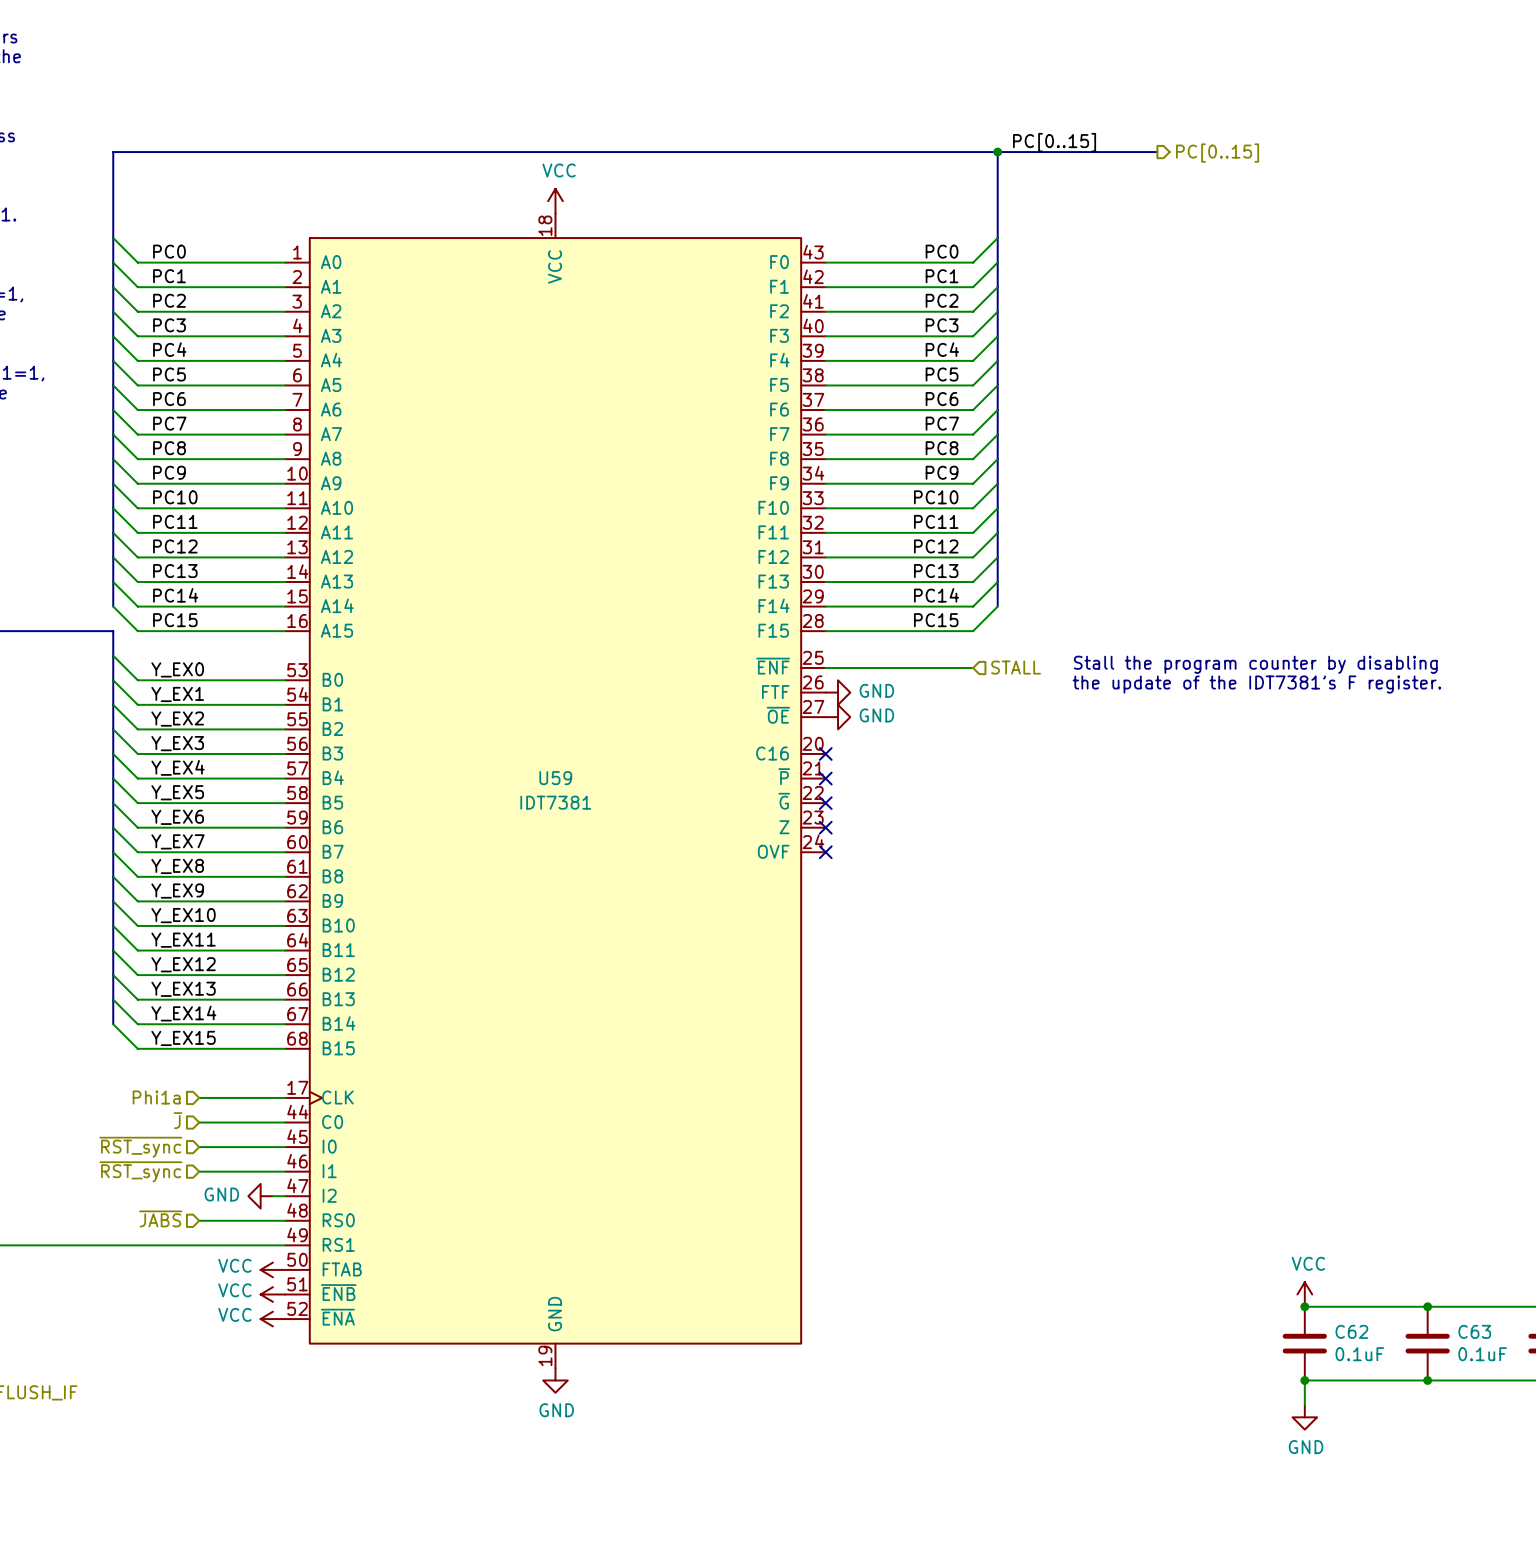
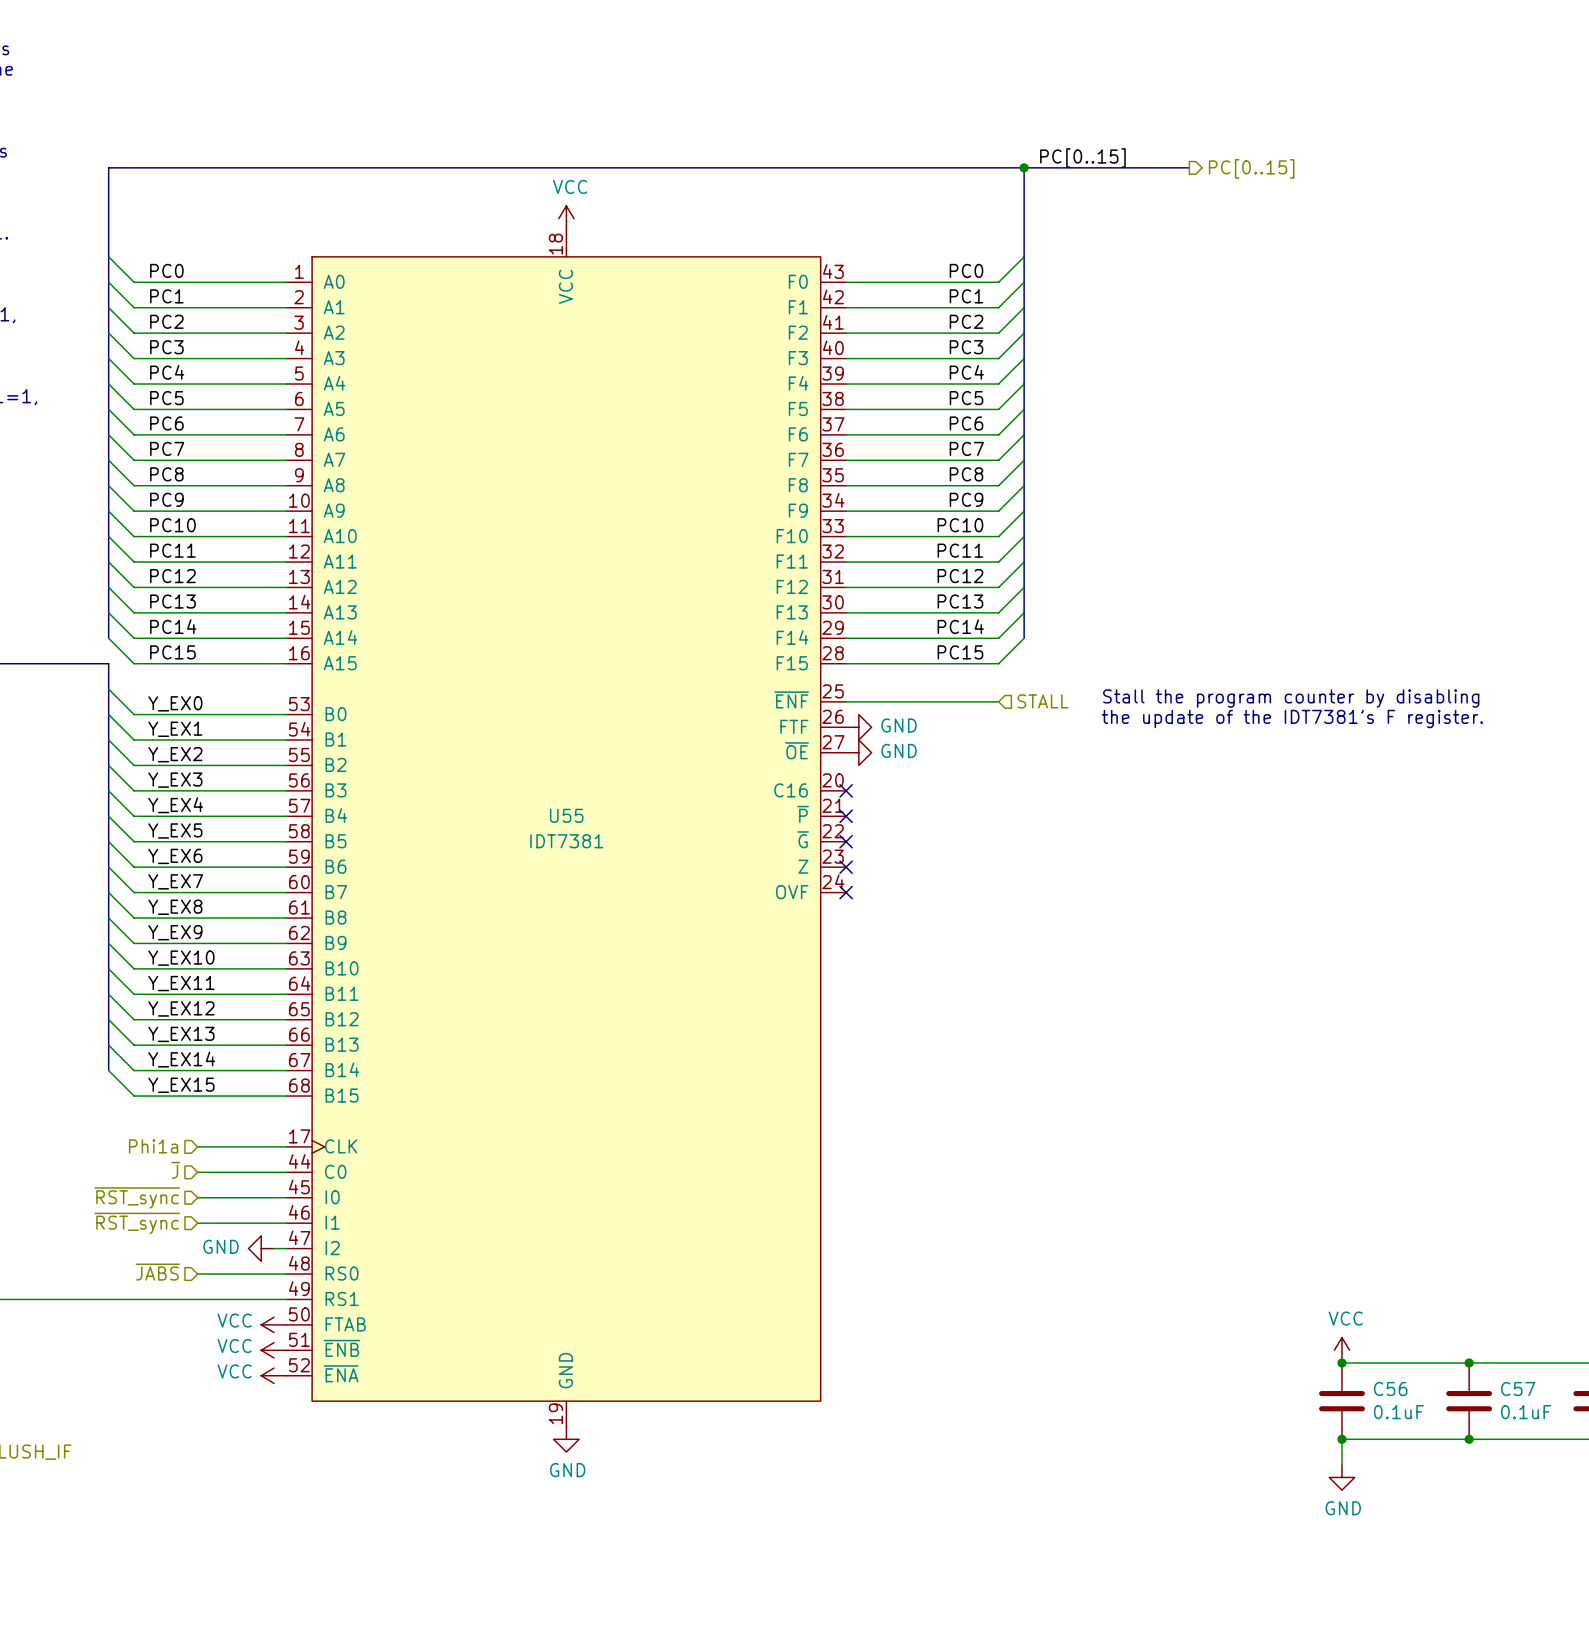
U59 name: U59 (555, 778) -> U55 (566, 815)
C62 name: C62 (1351, 1331) -> C56 (1390, 1389)
C63 name: C63 (1474, 1331) -> C57 (1518, 1389)

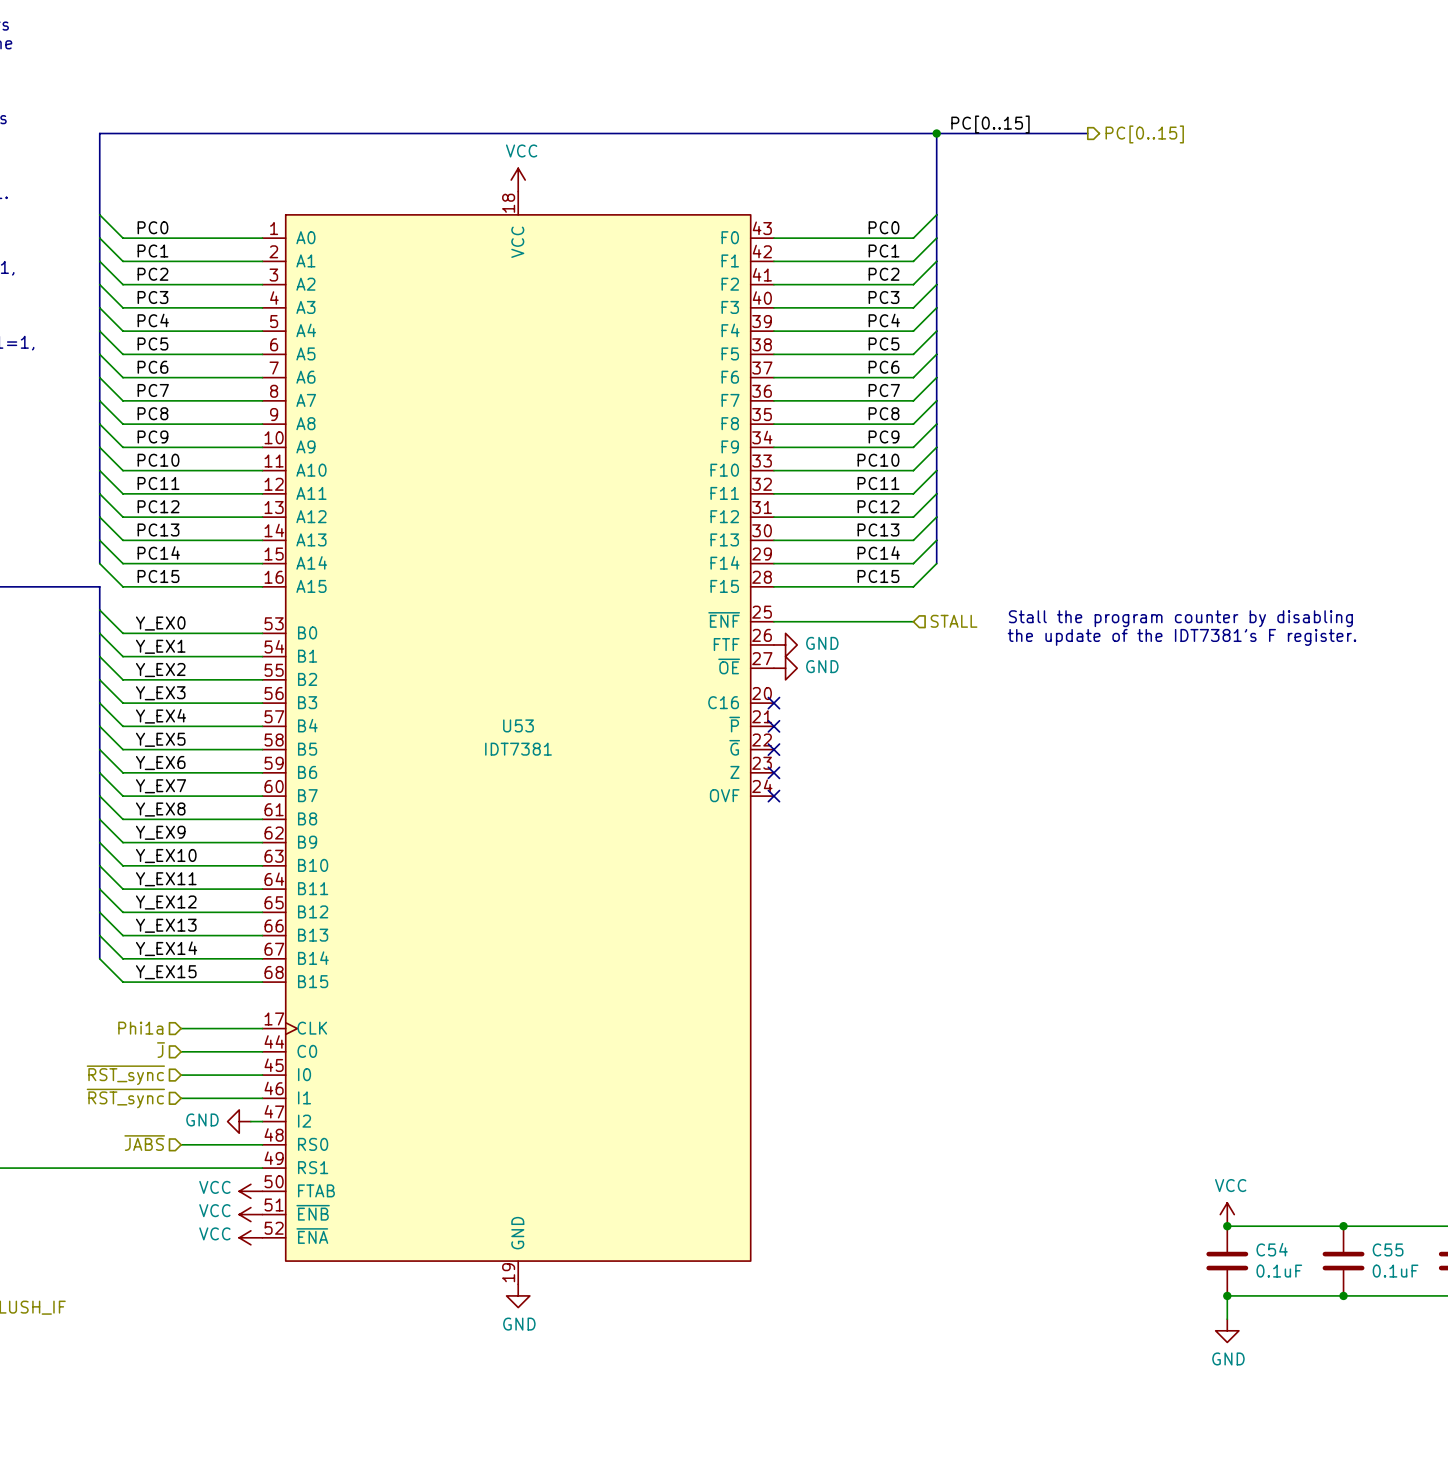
U55 name: U55 (566, 815) -> U53 (518, 725)
C56 name: C56 (1390, 1389) -> C54 (1272, 1249)
C57 name: C57 (1518, 1389) -> C55 (1388, 1249)

